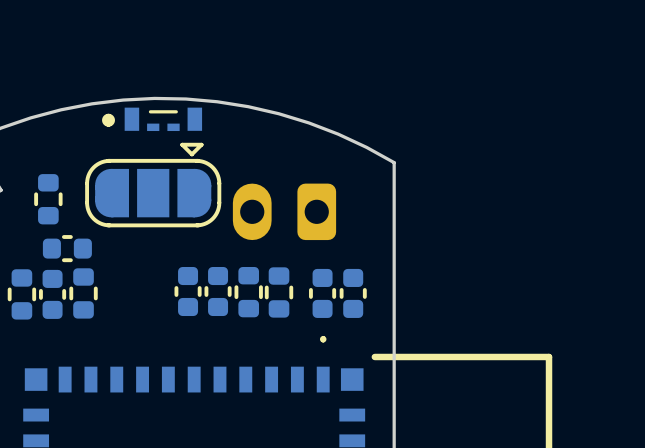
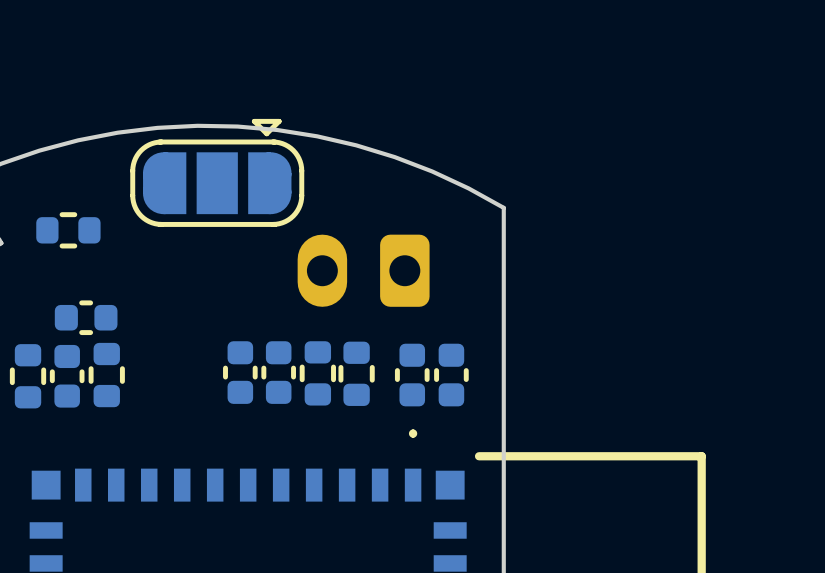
part footprint: [102, 107, 203, 132] -> [130, 118, 305, 227]
part: (153, 185) -> none
part rotation: 0° (48, 199) -> 90° clockwise (68, 230)

